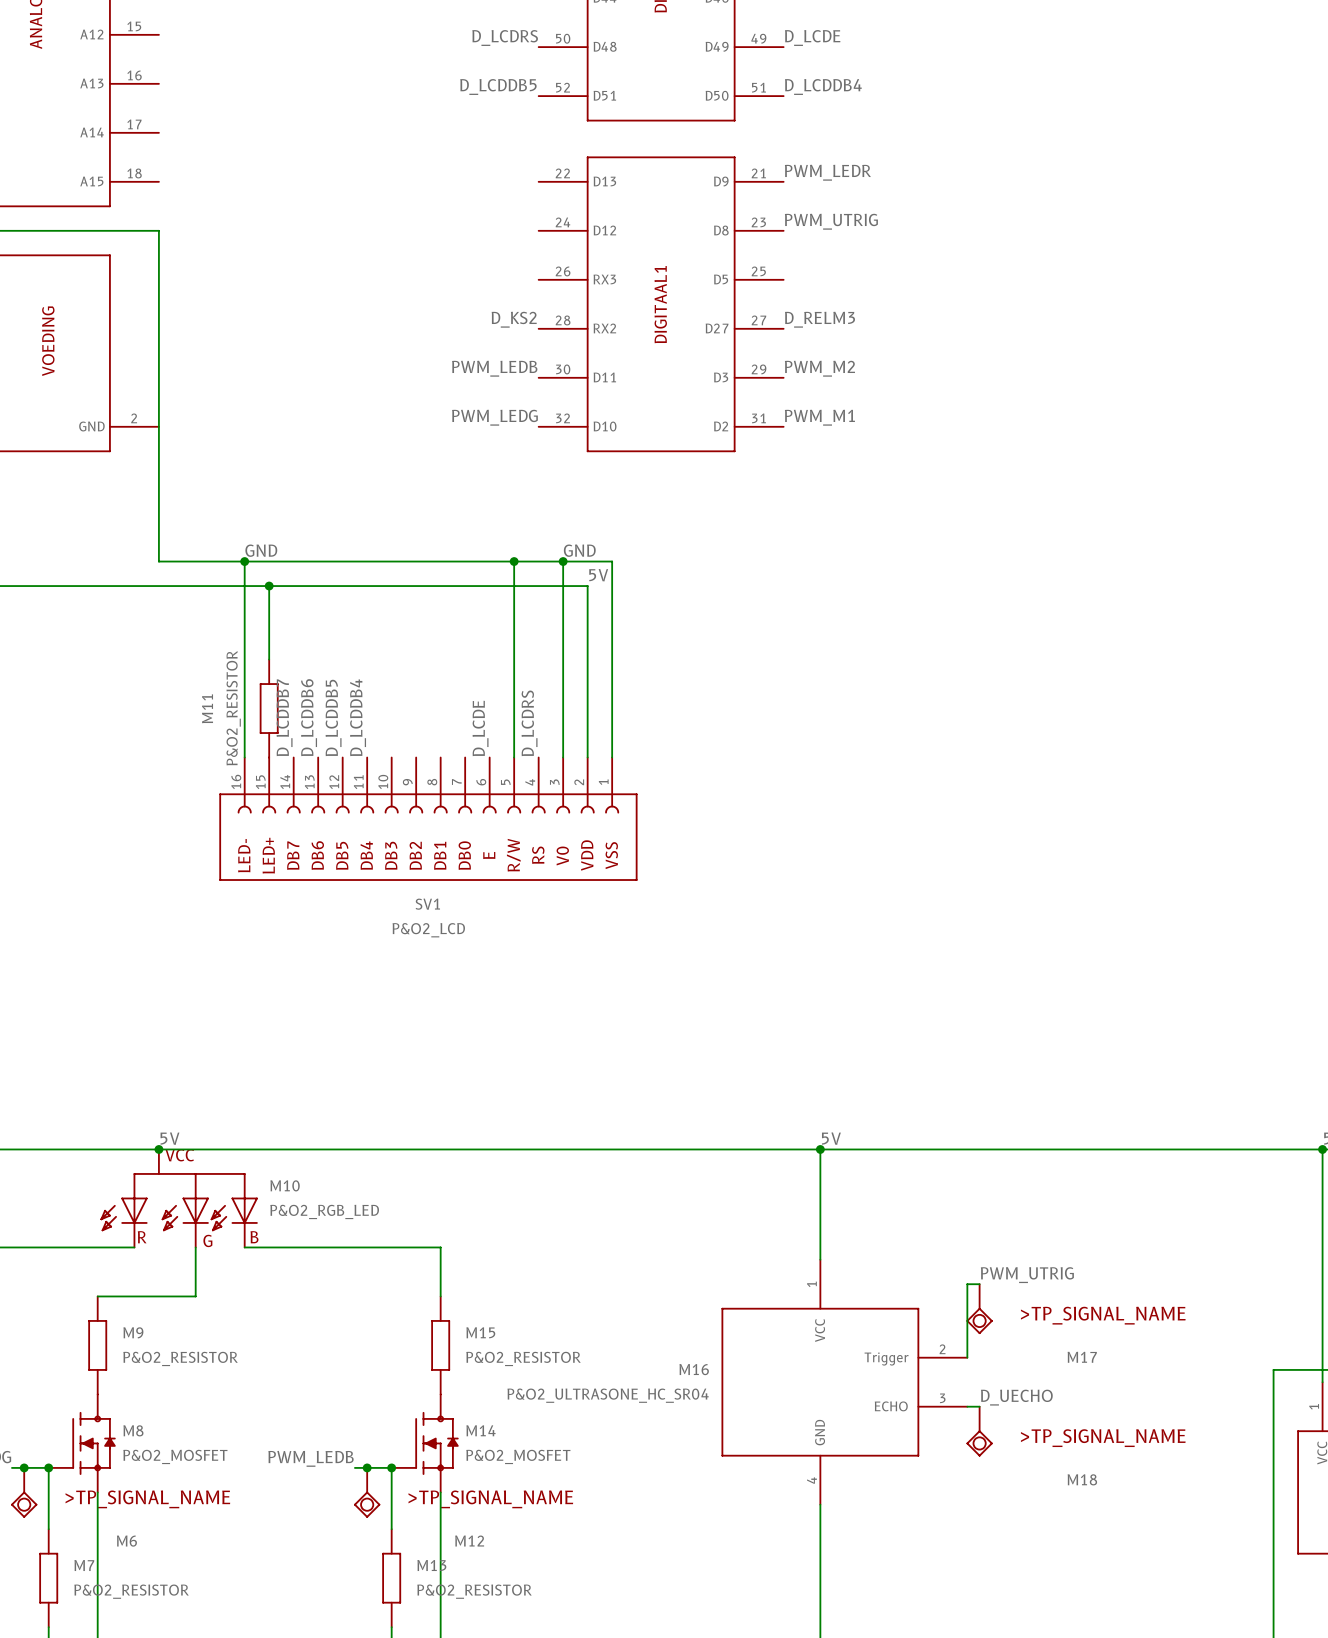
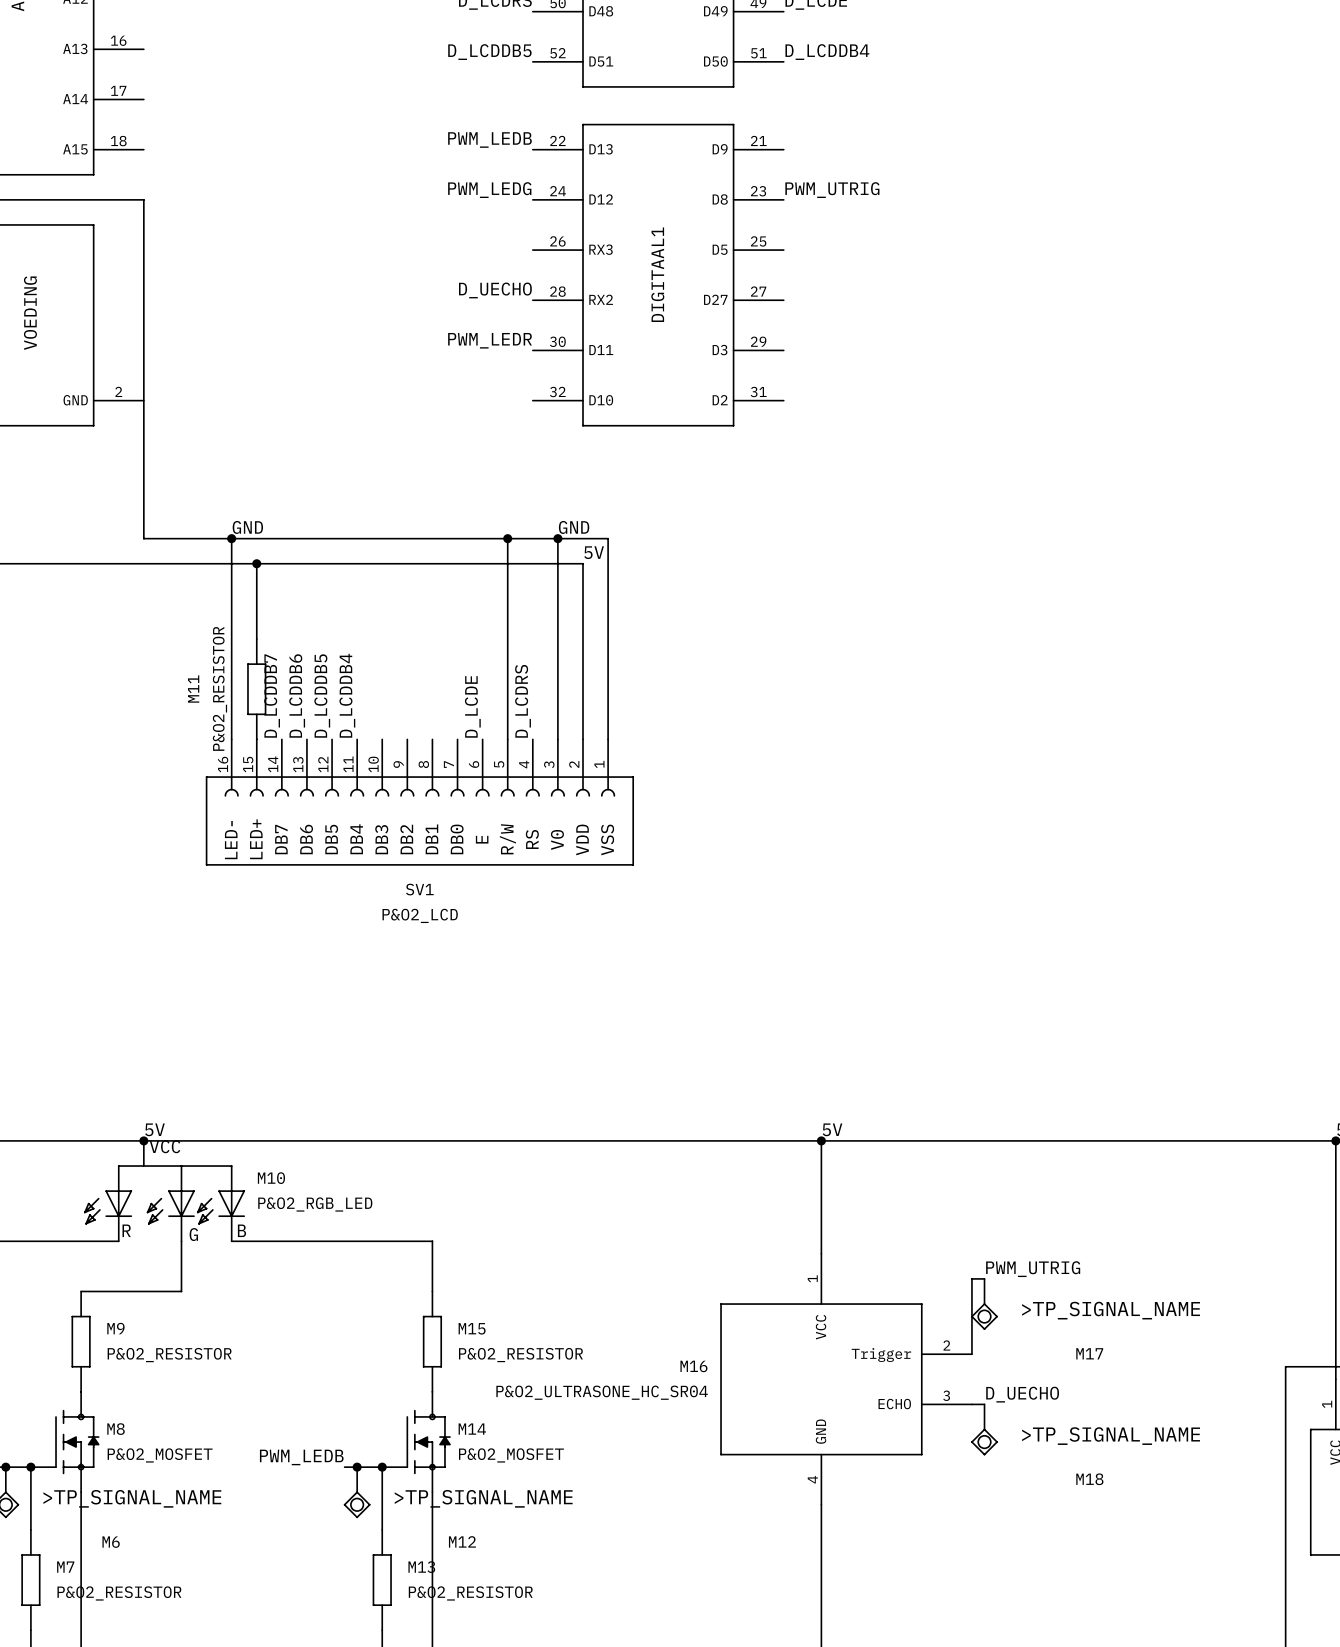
label: none -> PWM_LEDB (489, 140)
label: PWM_LEDR (827, 172) -> none
label: D_KS2 (514, 319) -> D_UECHO (495, 290)
label: D_RELM3 (820, 319) -> none
label: PWM_LEDB (494, 368) -> PWM_LEDR (490, 340)
label: PWM_M2 (819, 368) -> none
label position: PWM_LEDG (494, 417) -> PWM_LEDG (489, 190)
label: PWM_M1 (819, 417) -> none

